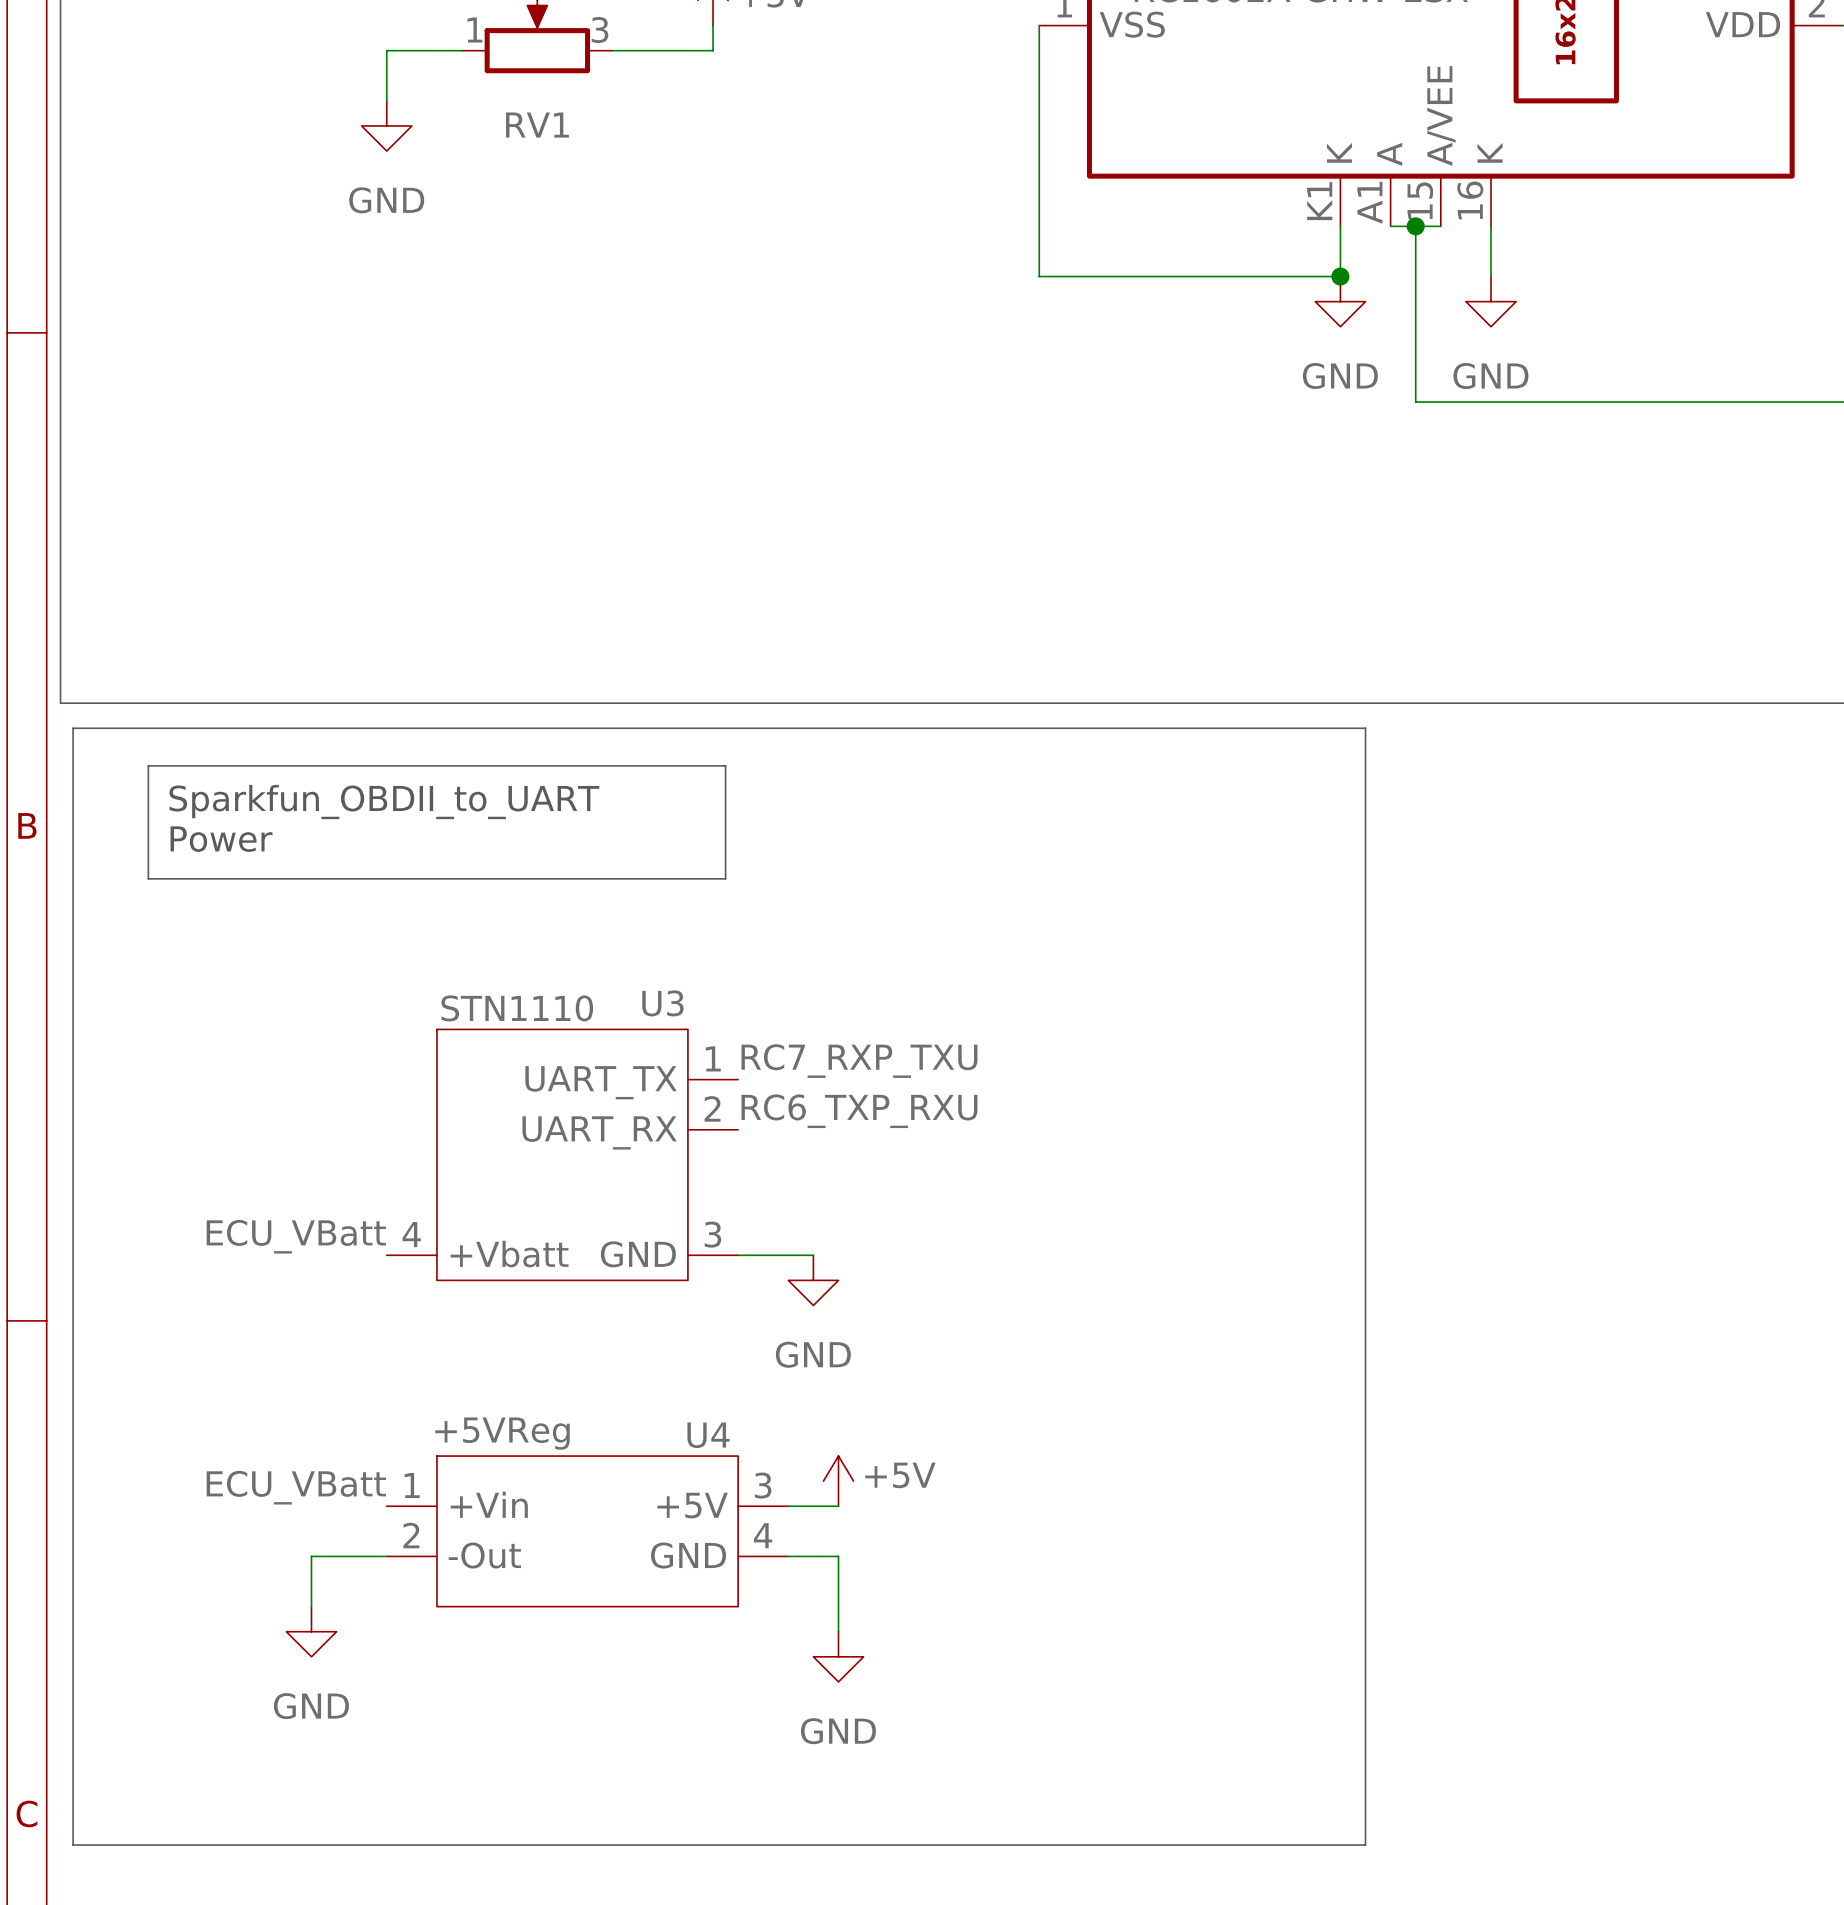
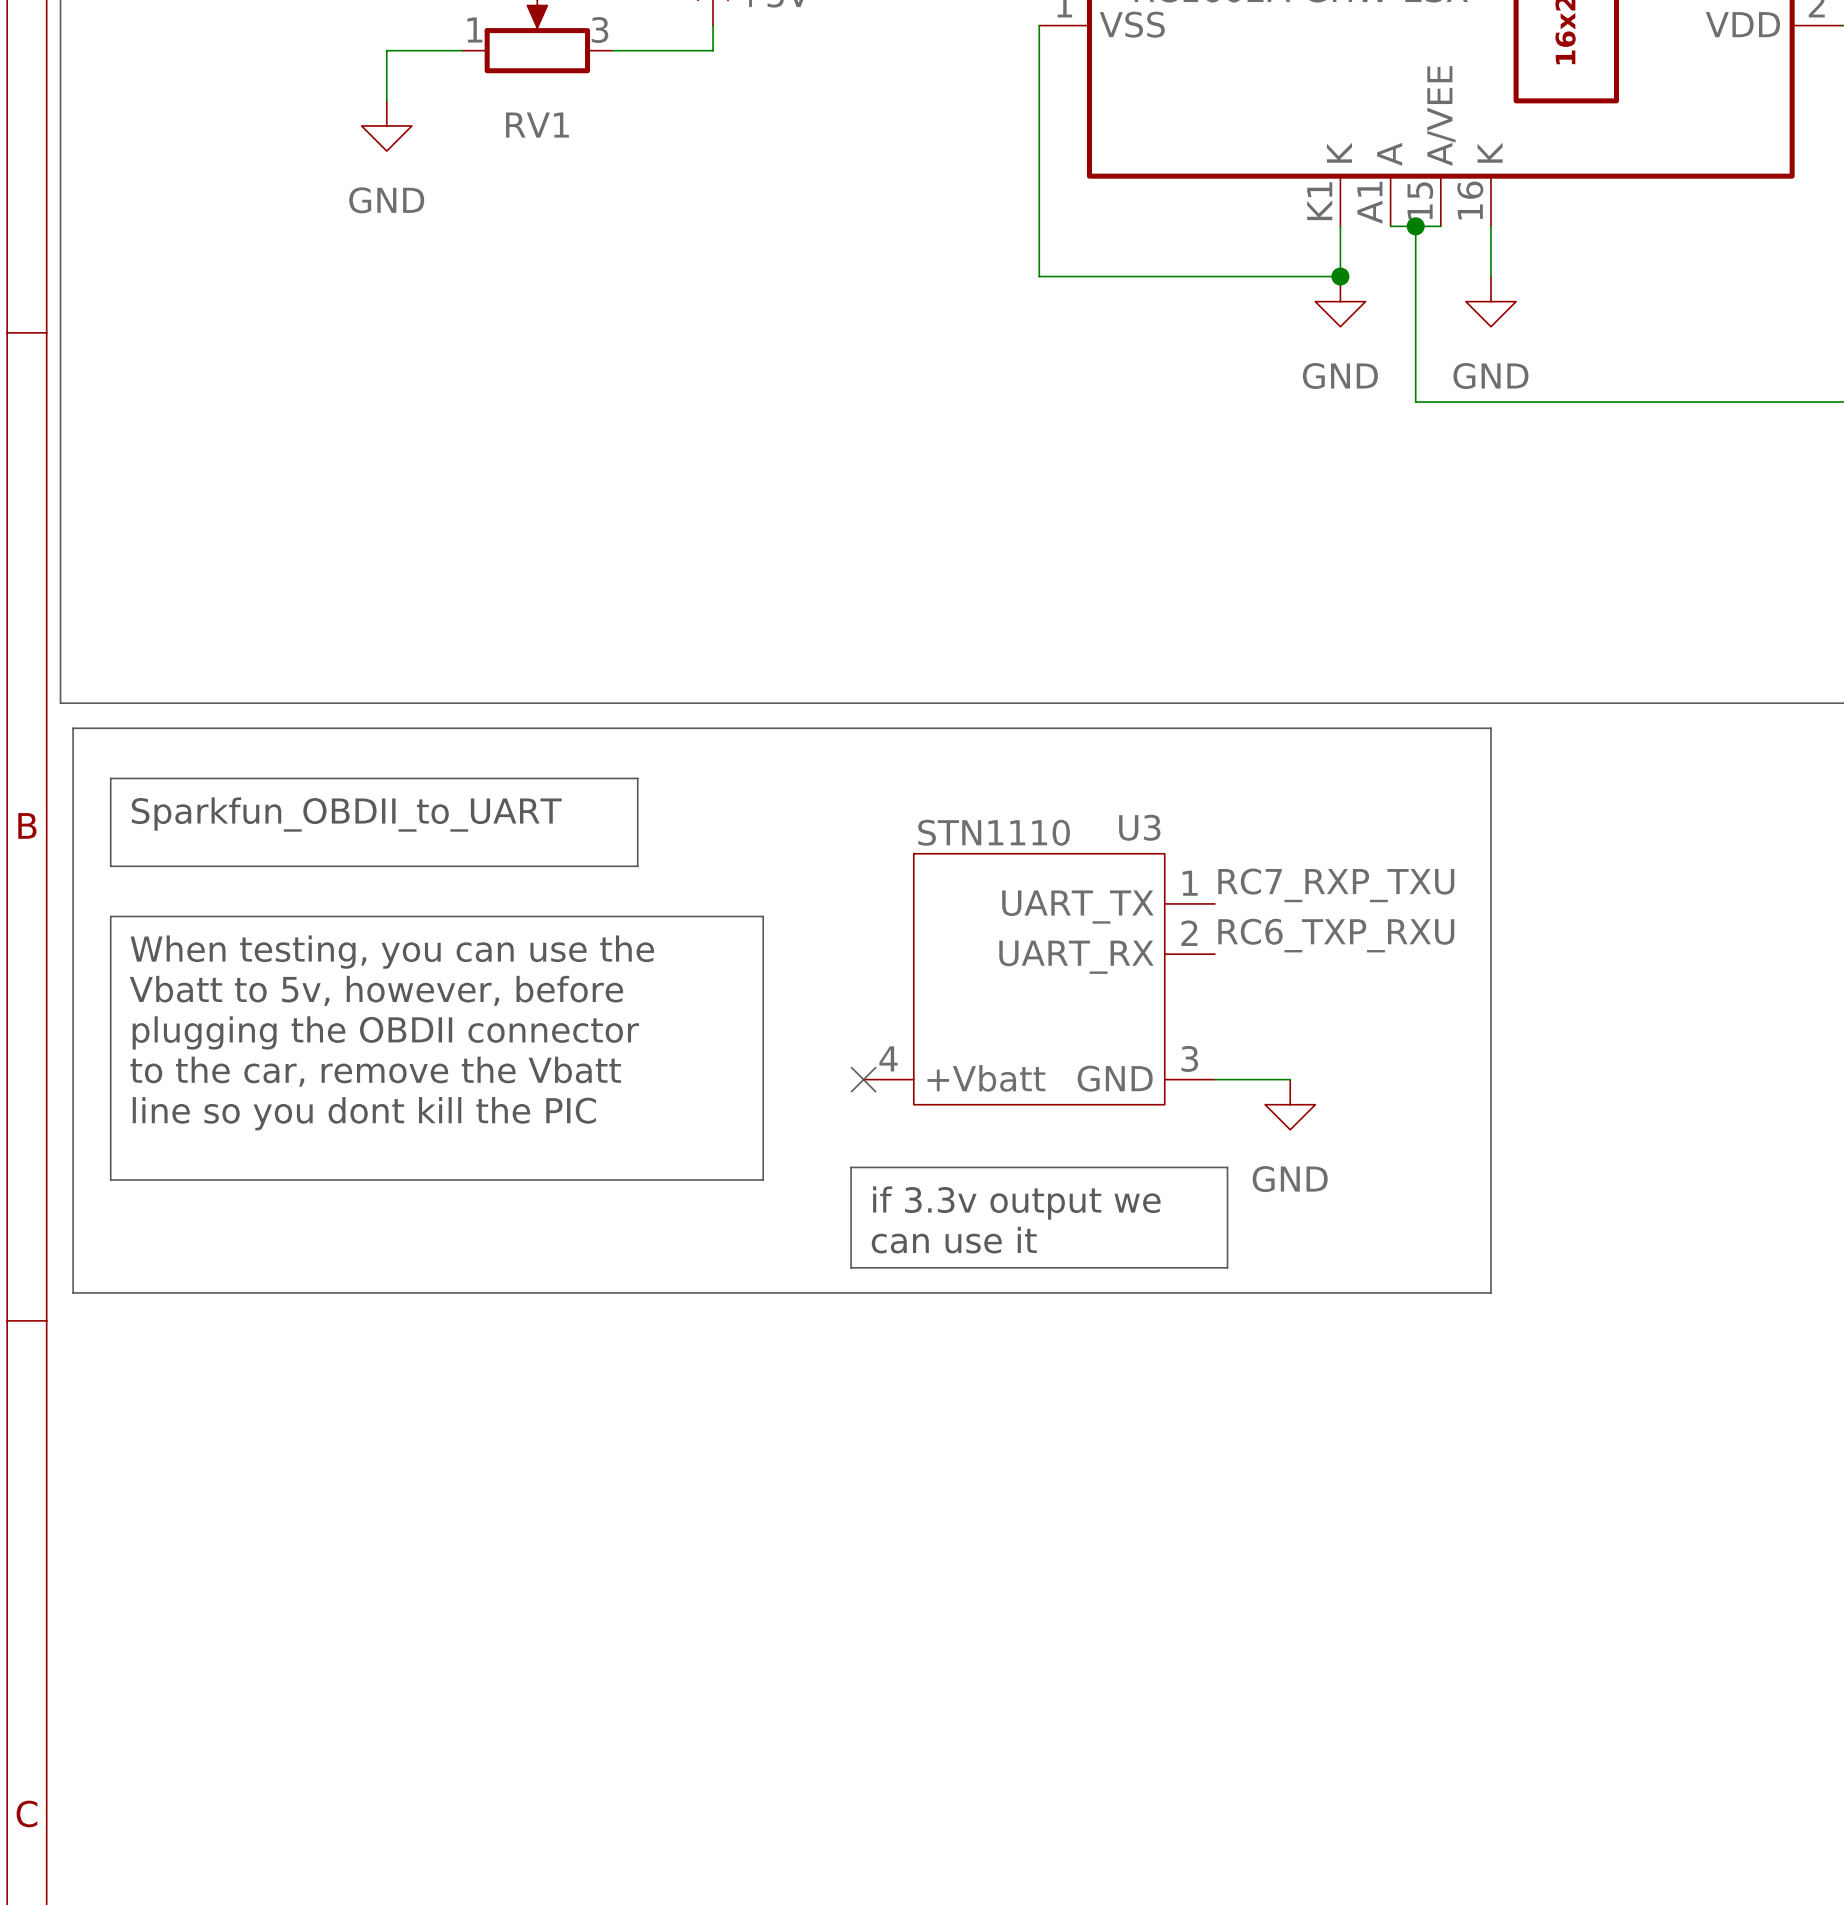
line: (1365, 728) (1365, 1845) (73, 1845) (73, 1292) -> (1365, 728) (1490, 728) (1490, 1292) (73, 1292)
line: (148, 765) (725, 765) (725, 878) (148, 878) (148, 765) -> (110, 778) (110, 866) (637, 866) (637, 778) (110, 778)
text position: Sparkfun_OBDII_to_UART (384, 802) -> Sparkfun_OBDII_to_UART (346, 814)
text: Power (221, 839) -> none
label: none -> RC7_RXP_TXU (1336, 885)
line: none -> (110, 916) (763, 916) (763, 1180) (110, 1180) (110, 916)
label: none -> RC6_TXP_RXU (1336, 935)
text: none -> When testing, you can use the (392, 952)
text: none -> Vbatt to 5v, however, before (376, 990)
text: none -> plugging the OBDII connector (385, 1032)
label: RC7_RXP_TXU (859, 1061) -> none
text: none -> to the car, remove the Vbatt (375, 1071)
no-connect mark: none -> (863, 1079)
wire: none -> (1214, 1079) (1290, 1079)
power symbol: none -> GND (1290, 1104)
label: RC6_TXP_RXU (859, 1111) -> none
text: none -> line so you dont kill the PIC (364, 1113)
U3 position: (562, 1154) -> (1039, 979)
line: none -> (851, 1167) (1227, 1167) (1227, 1267) (851, 1267) (851, 1167)
text: none -> if 3.3v output we (1016, 1203)
label: ECU_VBatt (296, 1236) -> none
text: none -> can use it (954, 1240)
wire: (738, 1255) (813, 1255) -> none
power symbol: GND (813, 1280) -> none
power symbol: +5V (838, 1481) -> none
label: ECU_VBatt (296, 1487) -> none
wire: (788, 1506) (838, 1506) -> none
U4: +5VReg (587, 1531) -> none
wire: (386, 1556) (311, 1556) (311, 1606) -> none
wire: (788, 1556) (838, 1556) (838, 1631) -> none
power symbol: GND (311, 1631) -> none
power symbol: GND (838, 1656) -> none

